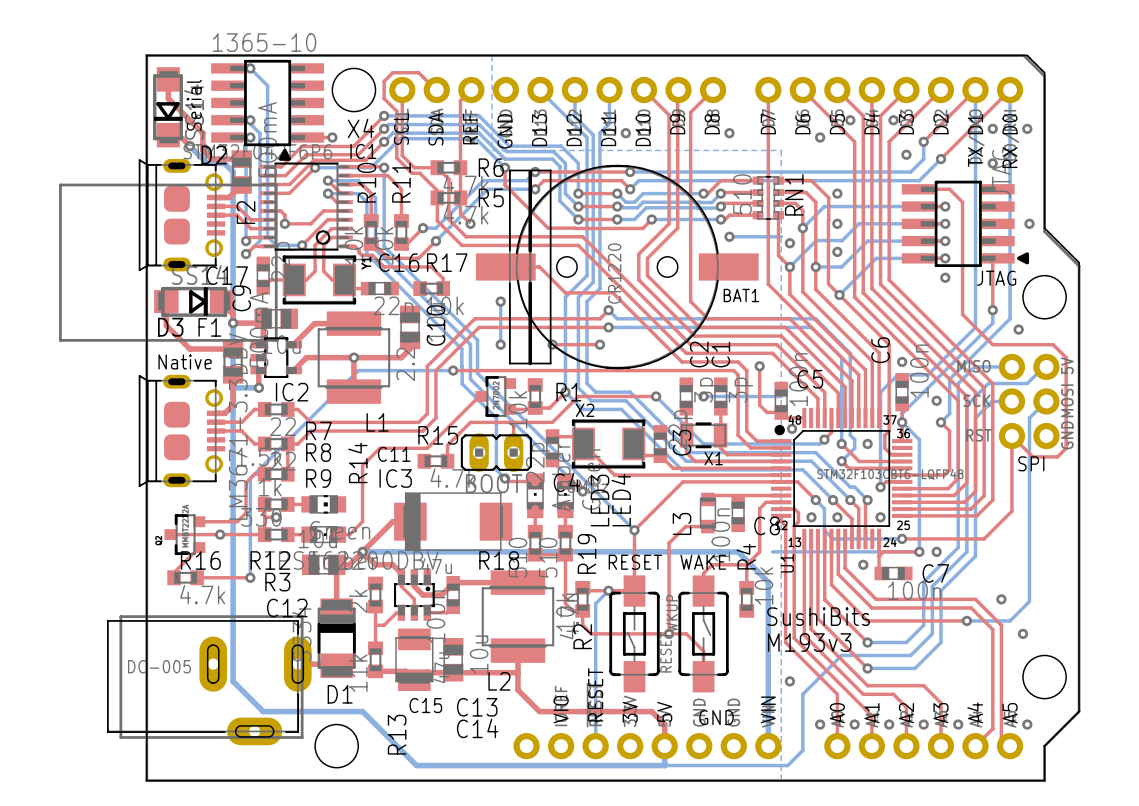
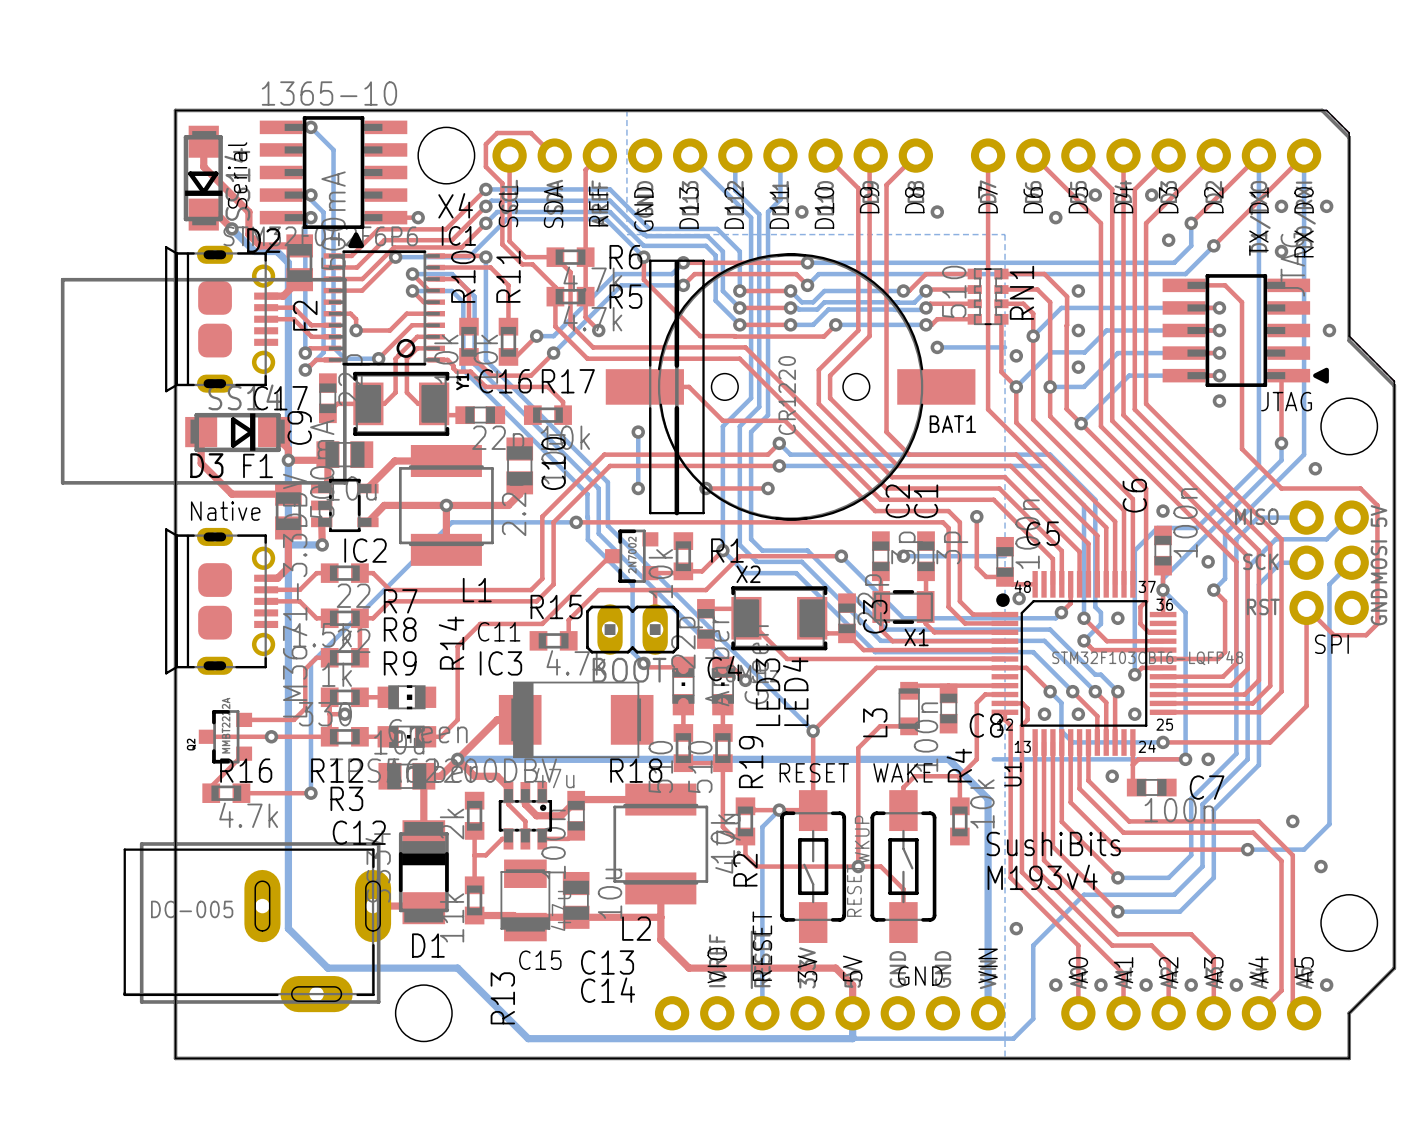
text: M193v3 (809, 642) -> M193v4 (1042, 877)

